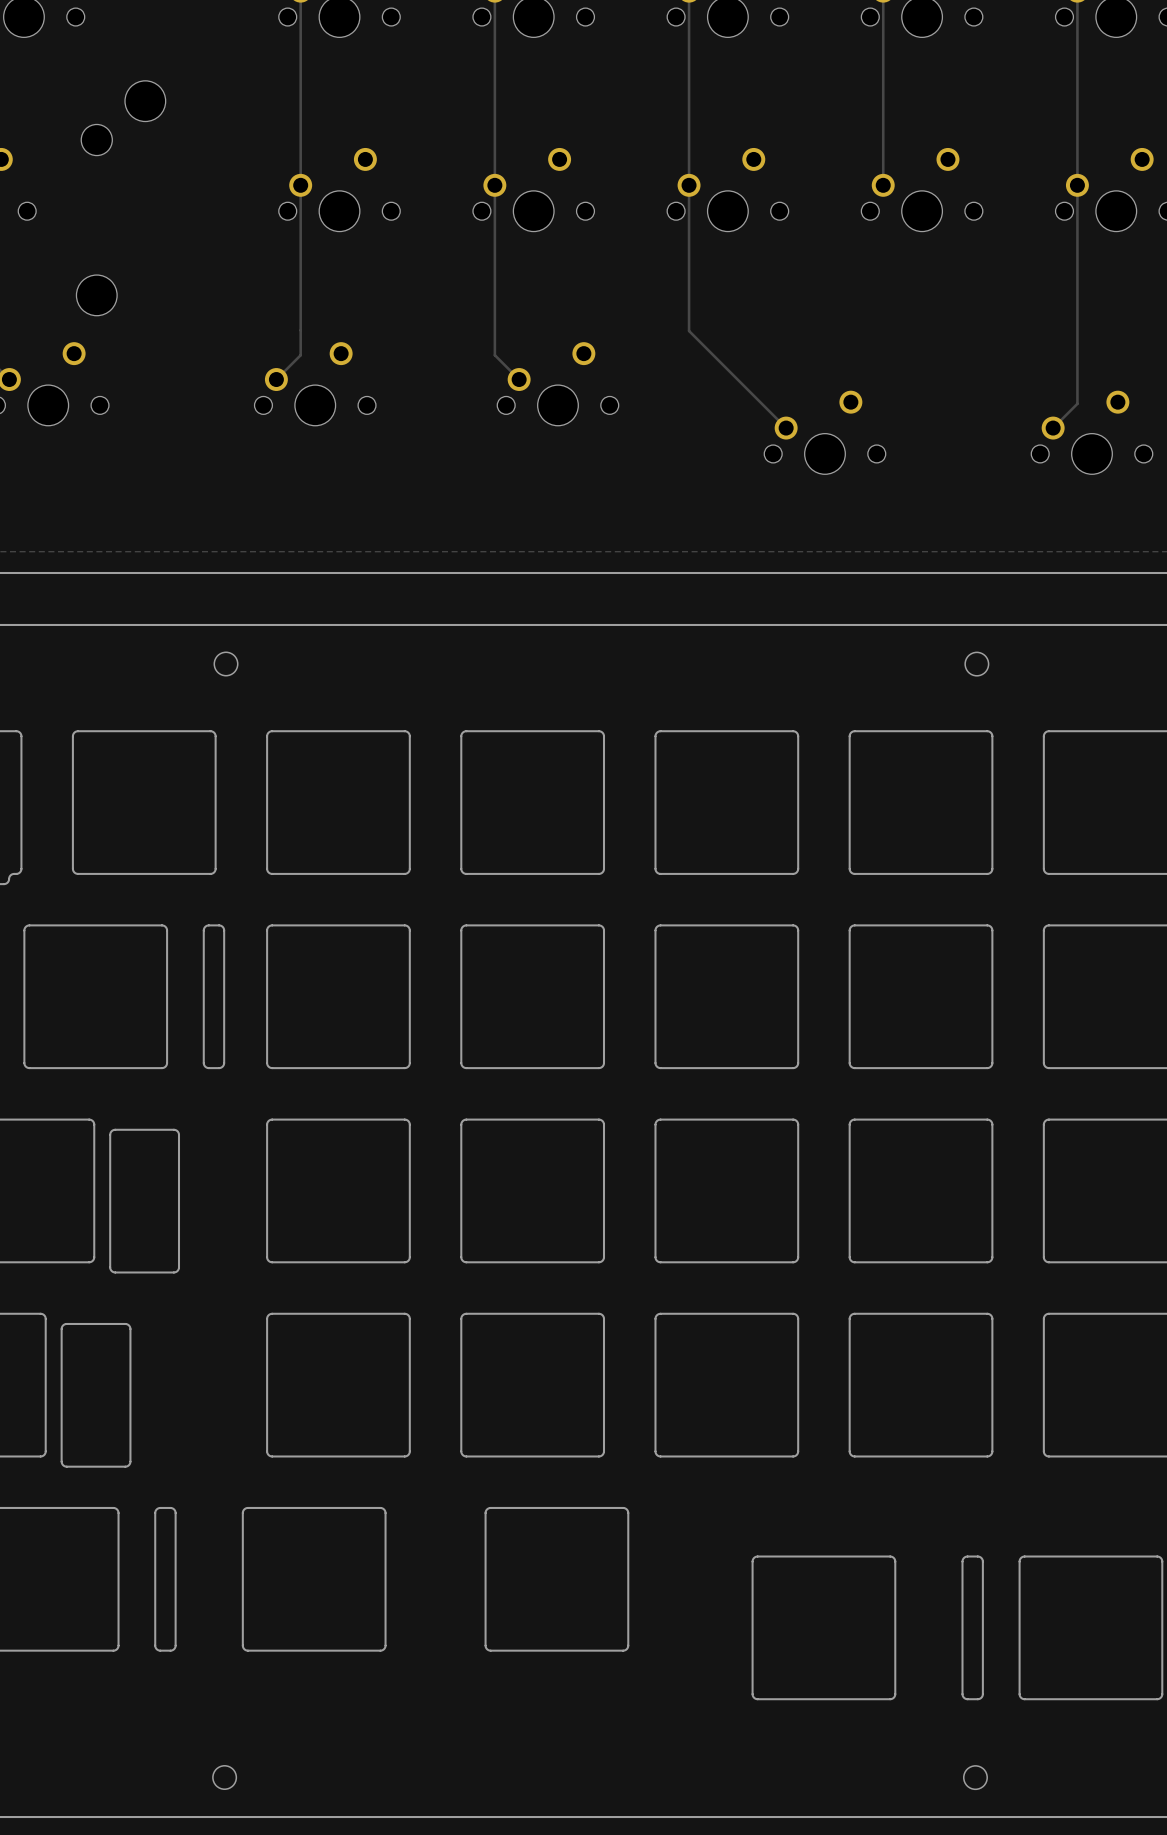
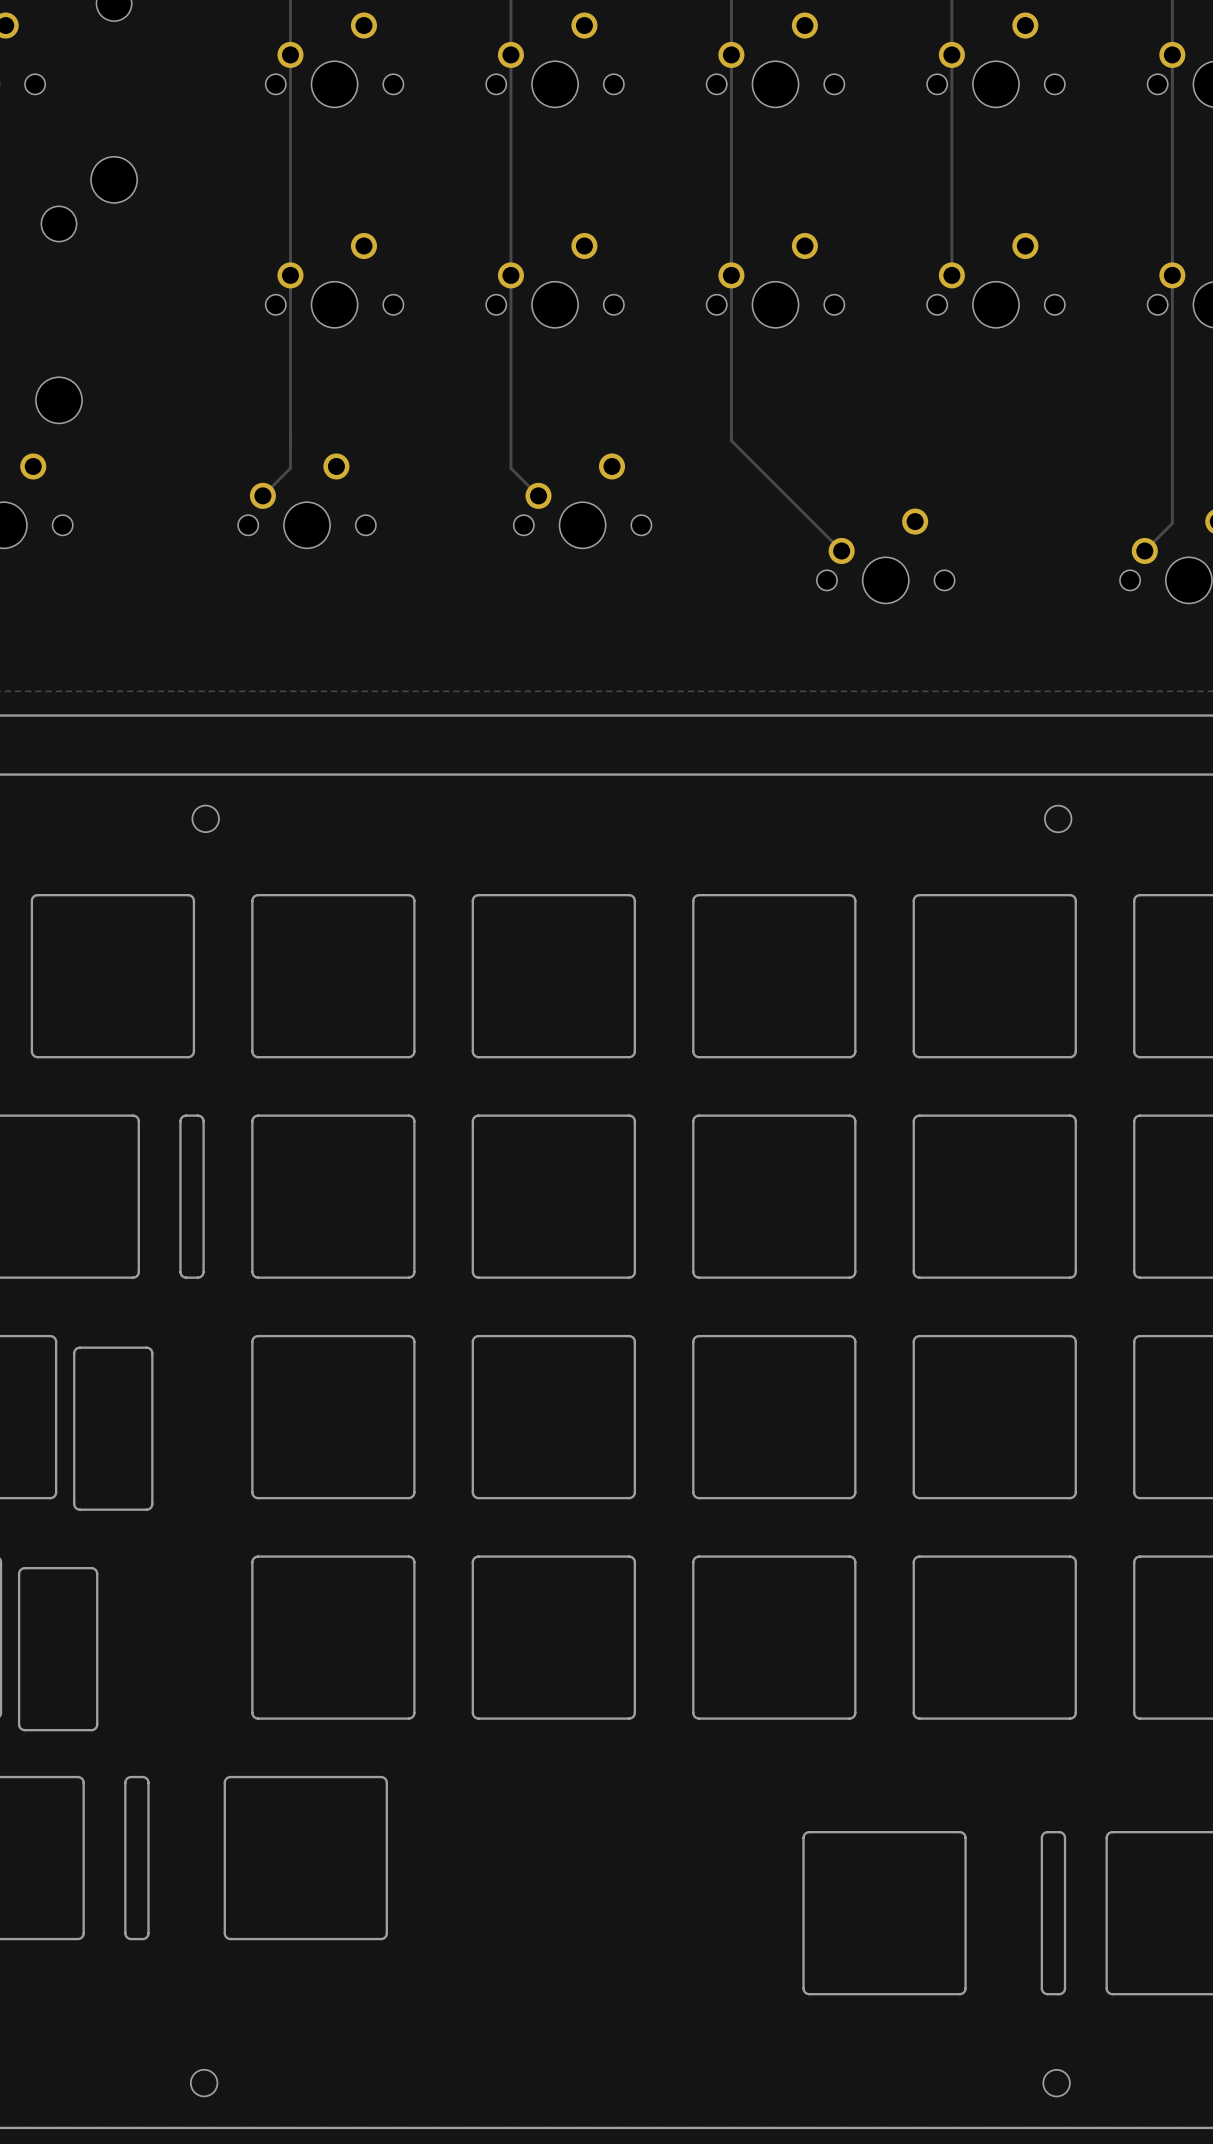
board edge: (490, 1507) (626, 1509) (626, 1649) (487, 1649) (485, 1513) (490, 1507) -> none

